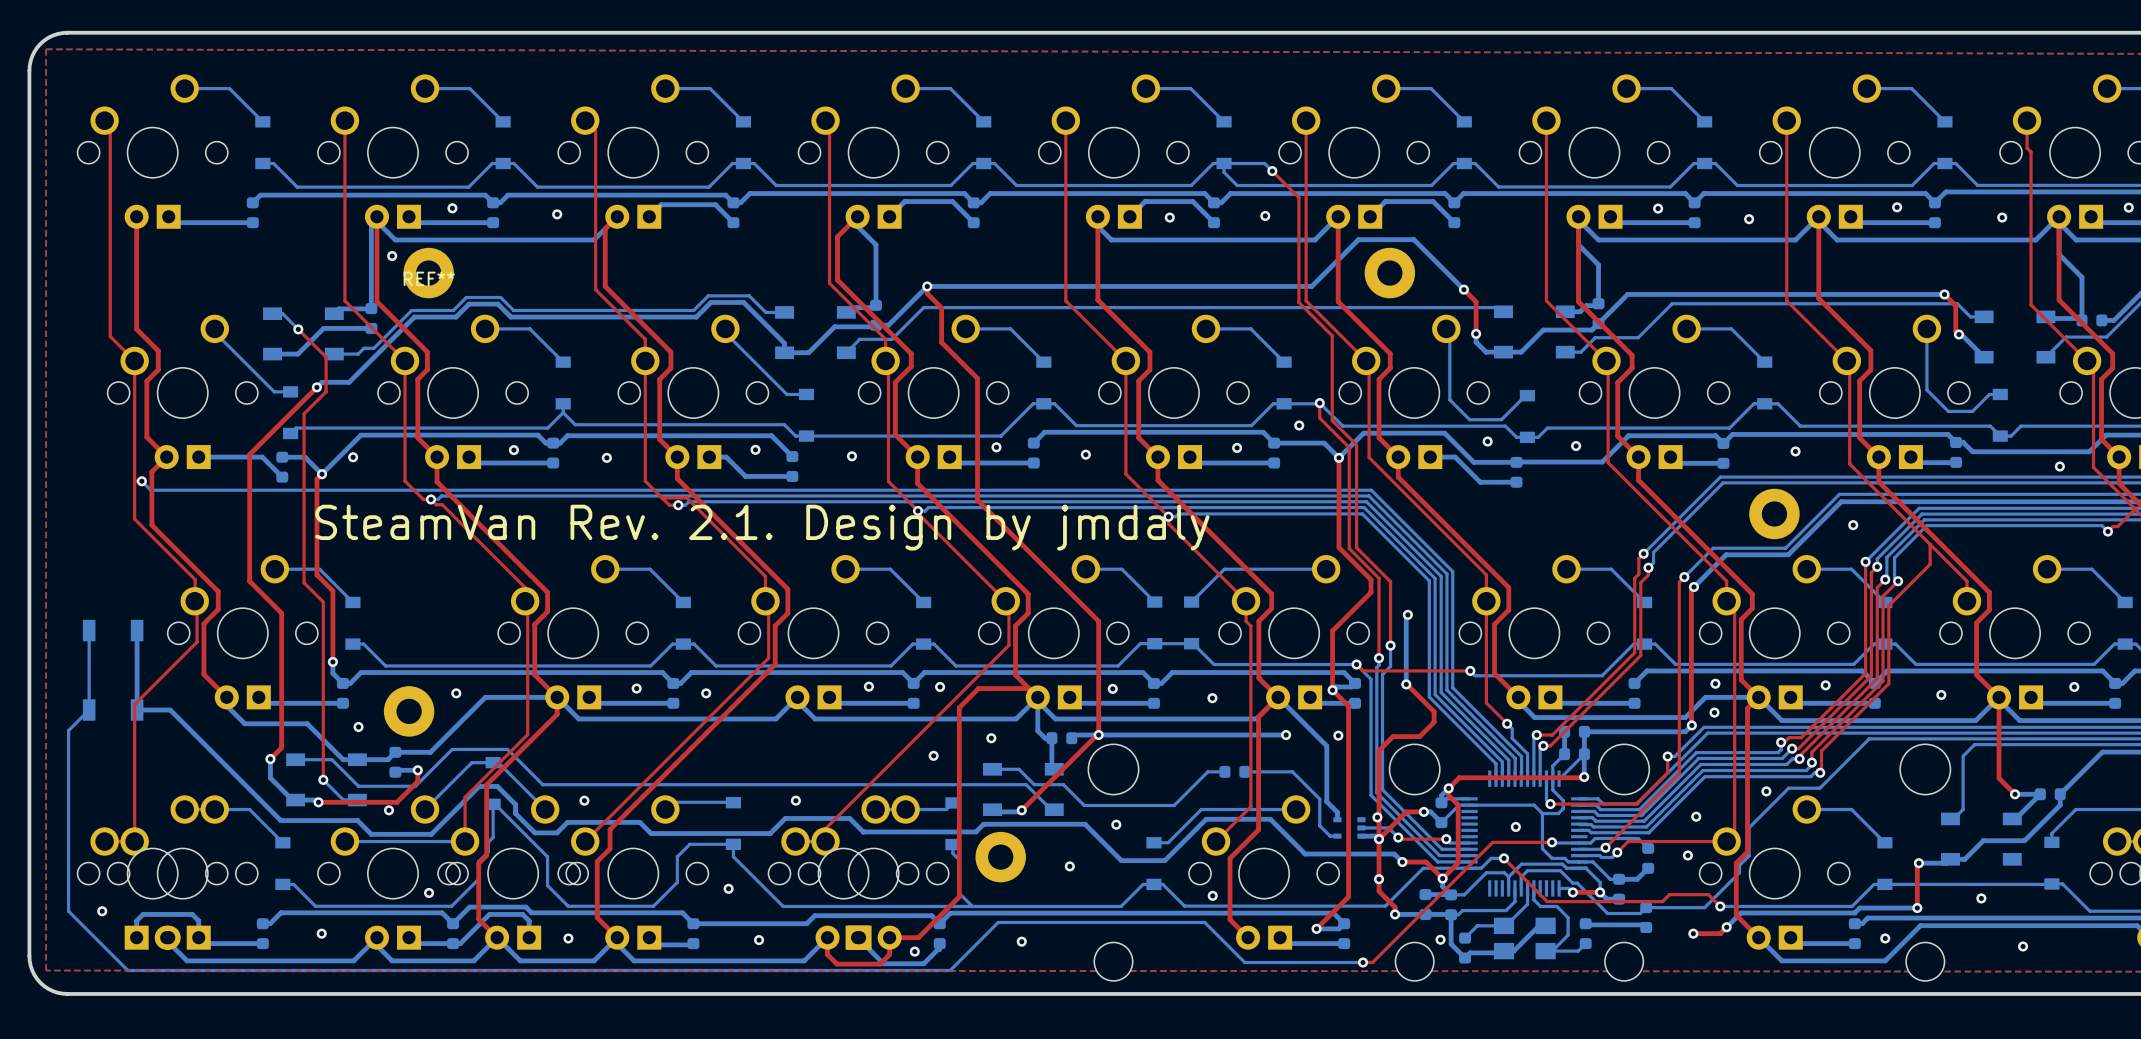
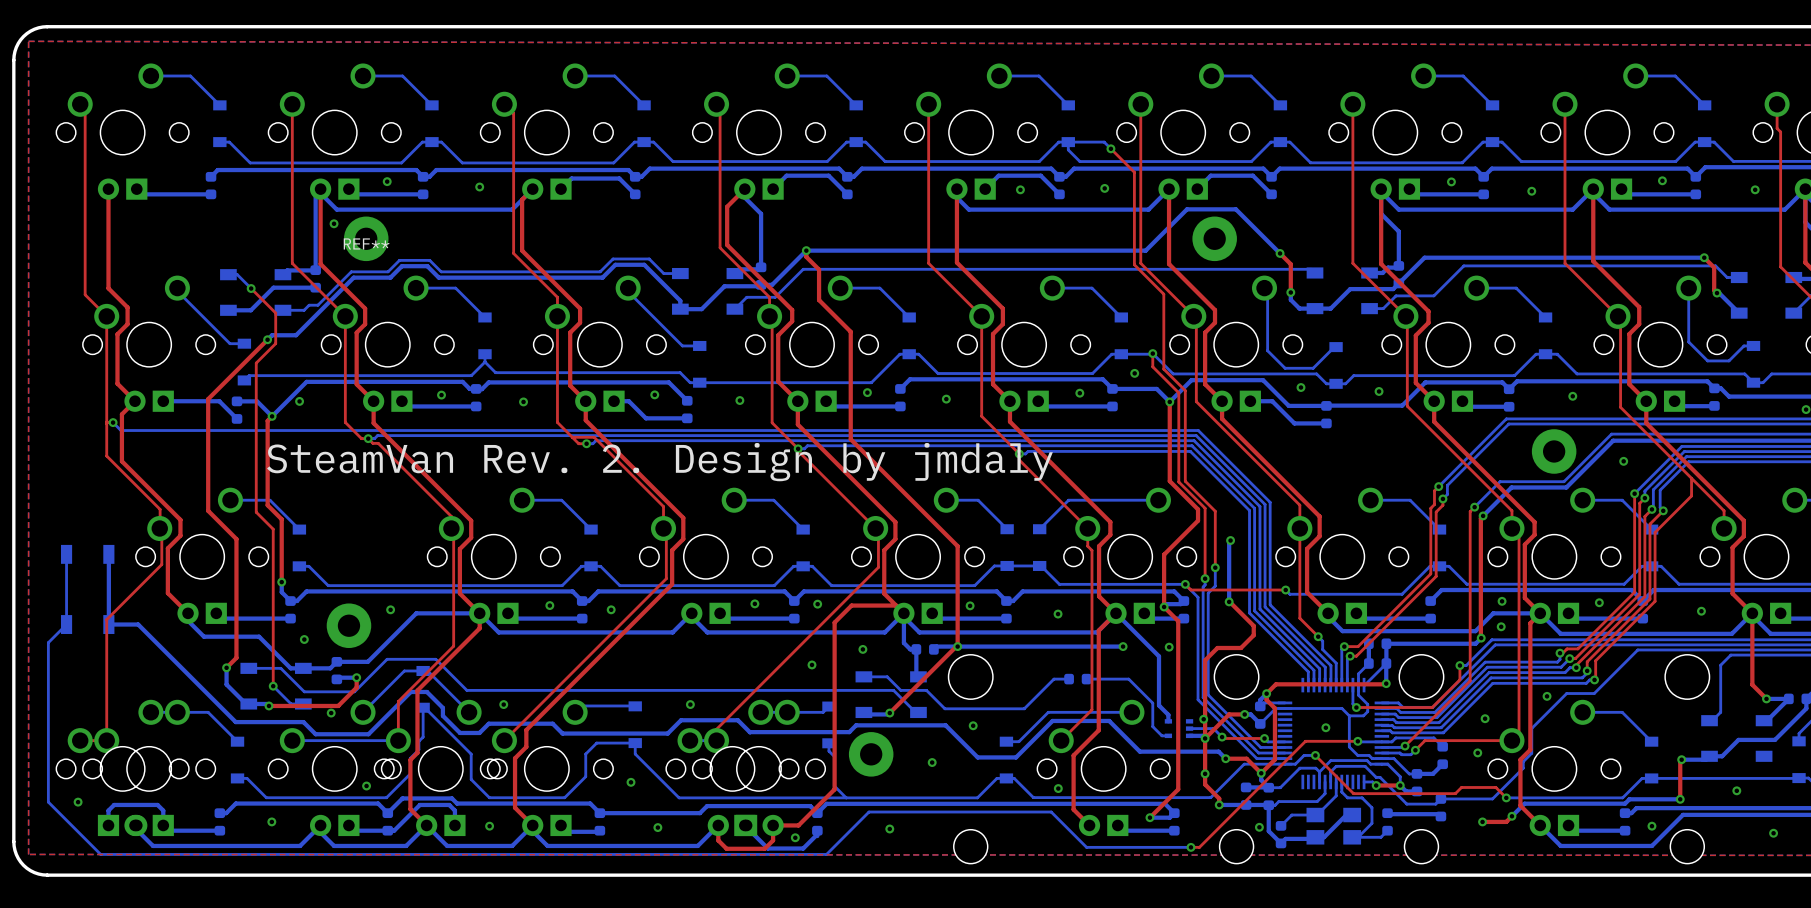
text: SteamVan Rev. 2.1. Design by jmdaly (762, 527) -> SteamVan Rev. 2. Design by jmdaly (659, 462)

